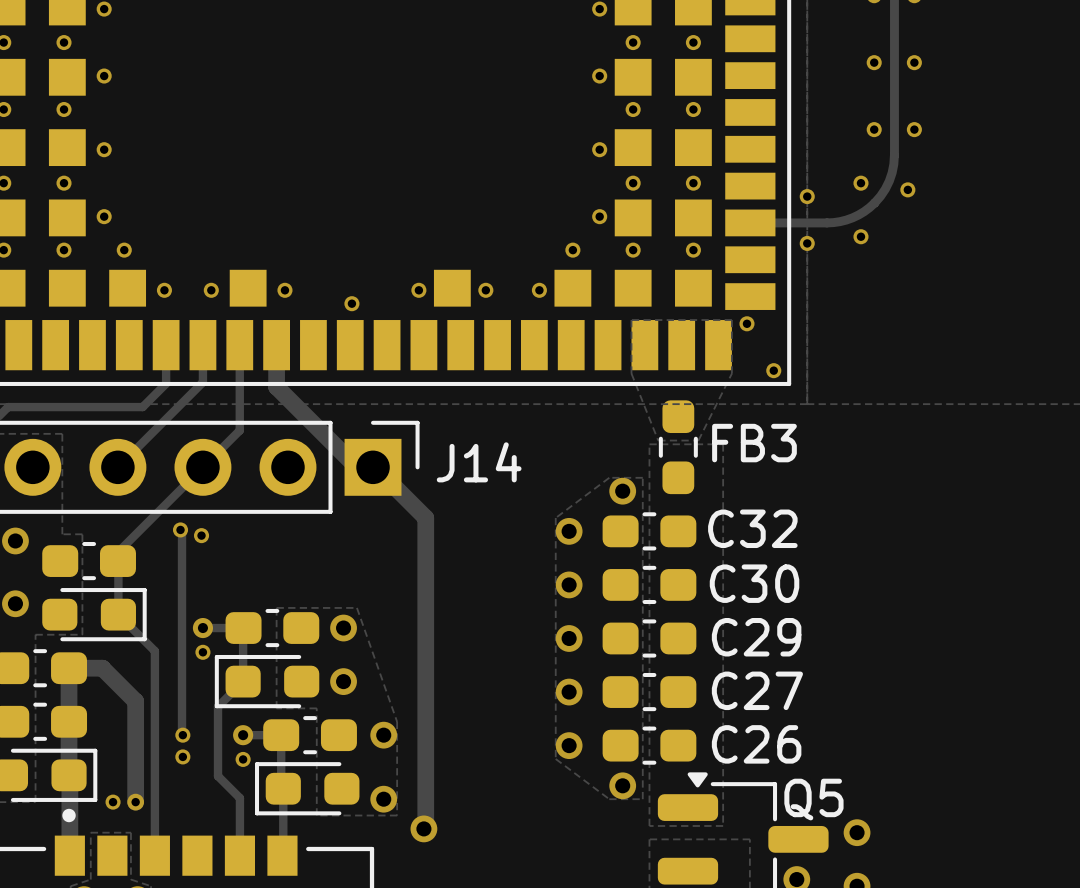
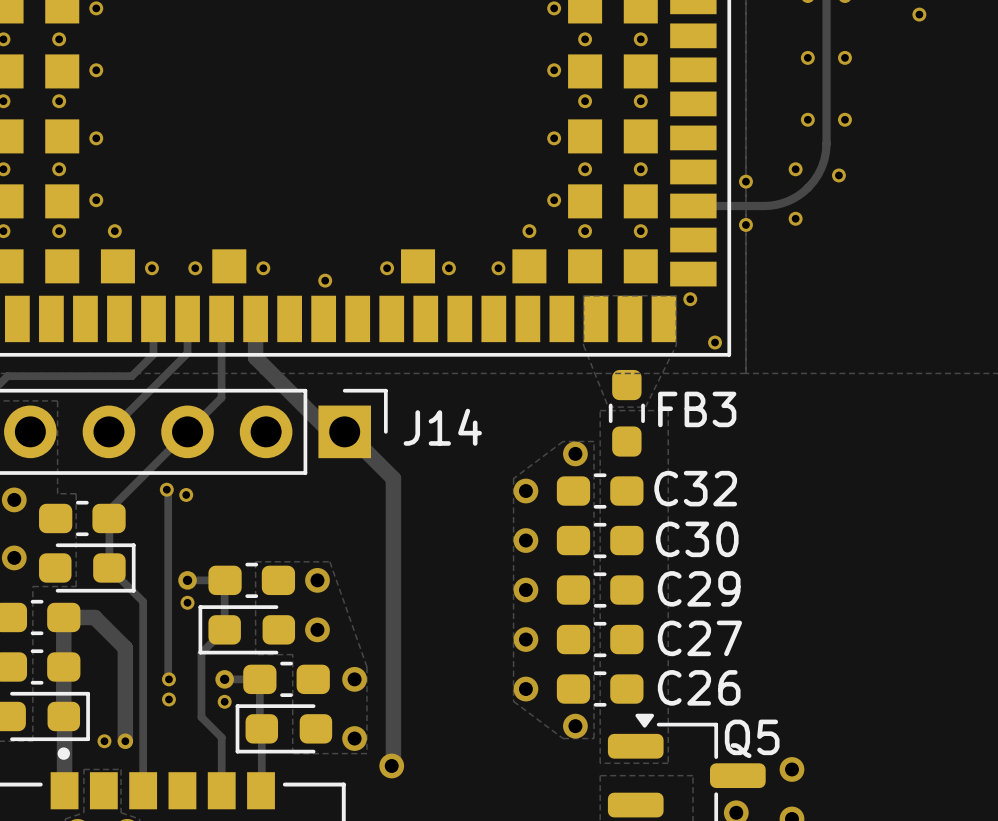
via: none -> (919, 14)

